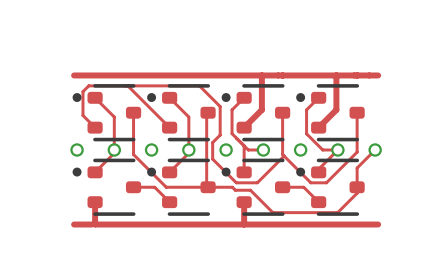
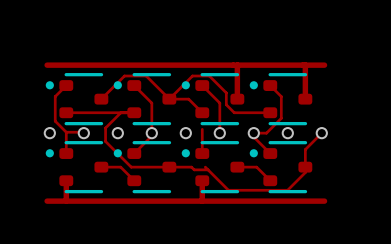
top track: (261, 75) (261, 109) (244, 127) -> (169, 99) (188, 99) (202, 112)
top track: (336, 75) (336, 109) (318, 127) -> (169, 99) (192, 76) (209, 76) (226, 92) (226, 104) (234, 112) (270, 112)
top track: none -> (305, 65) (305, 99)
top track: (127, 85) (169, 127) -> (66, 112) (134, 112)
top track: (95, 97) (114, 117) (114, 153) (95, 172) -> (66, 132) (66, 153)
top track: (244, 97) (232, 109) (232, 133) (248, 149) (263, 149) -> (202, 85) (219, 103) (219, 133)
top track: (318, 97) (306, 109) (306, 133) (322, 149) (337, 149) (318, 169) (318, 172) -> (270, 85) (281, 96) (281, 118) (266, 133) (253, 133) (253, 137) (270, 153)
top track: (82, 109) (82, 91) (88, 85) (199, 85) (220, 106) (220, 135) (212, 142) (212, 159) (236, 182) (257, 182) (284, 156) -> (55, 96) (66, 85)
top track: (133, 112) (133, 154) (138, 159) -> (120, 112) (105, 128) (105, 141)
top track: (208, 112) (208, 187) -> (169, 99) (146, 76) (124, 76) (101, 99)
top track: (282, 112) (282, 154) (310, 182) (326, 182) (357, 152) (357, 112) -> (237, 99) (237, 65)
top track: (82, 115) (95, 127) -> (55, 101) (55, 121) (66, 132)
top track: none -> (66, 132) (83, 133)

